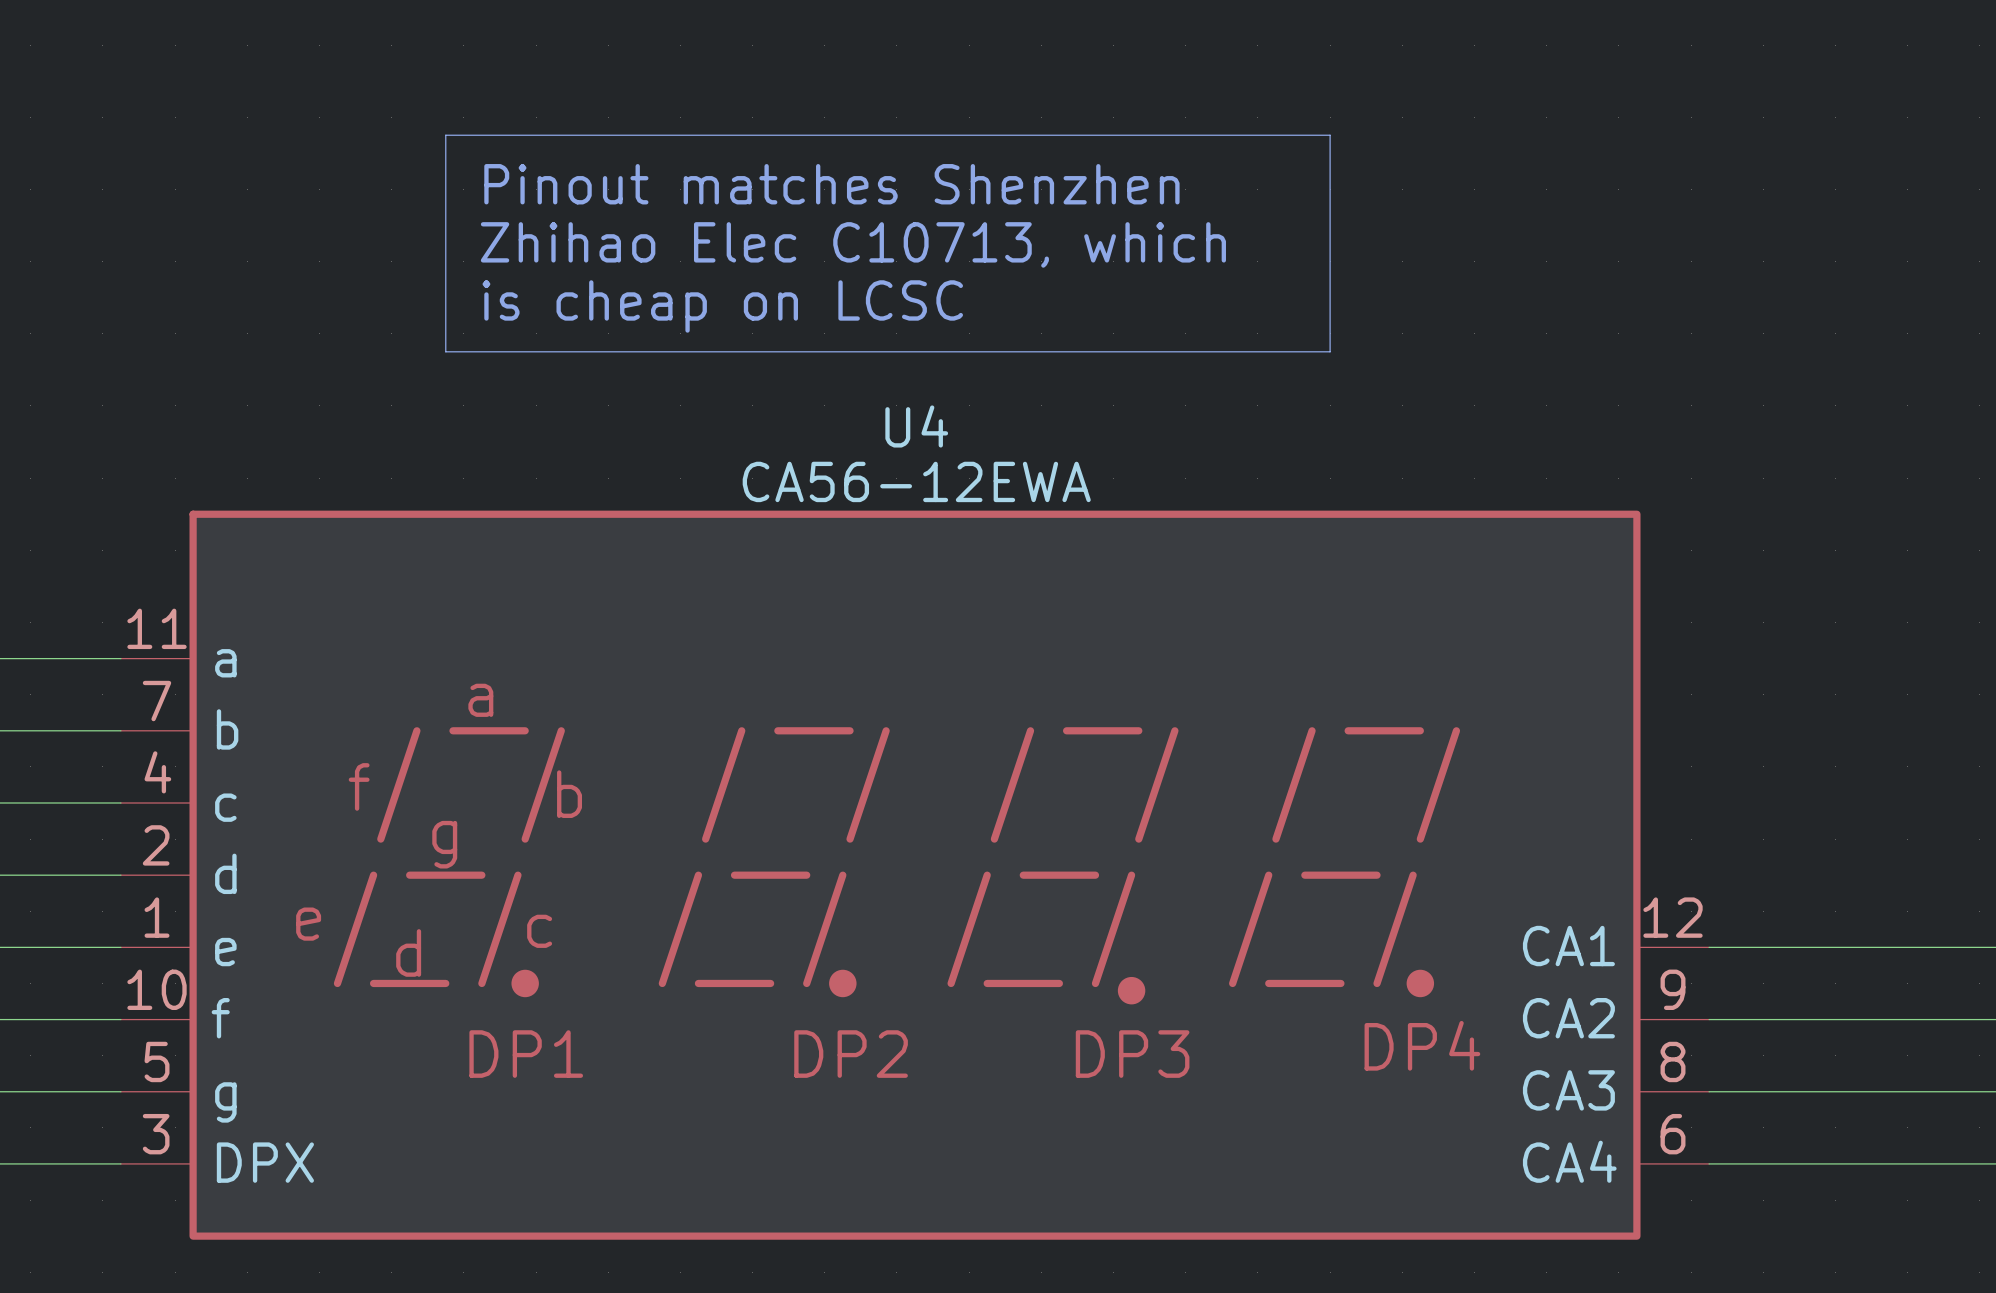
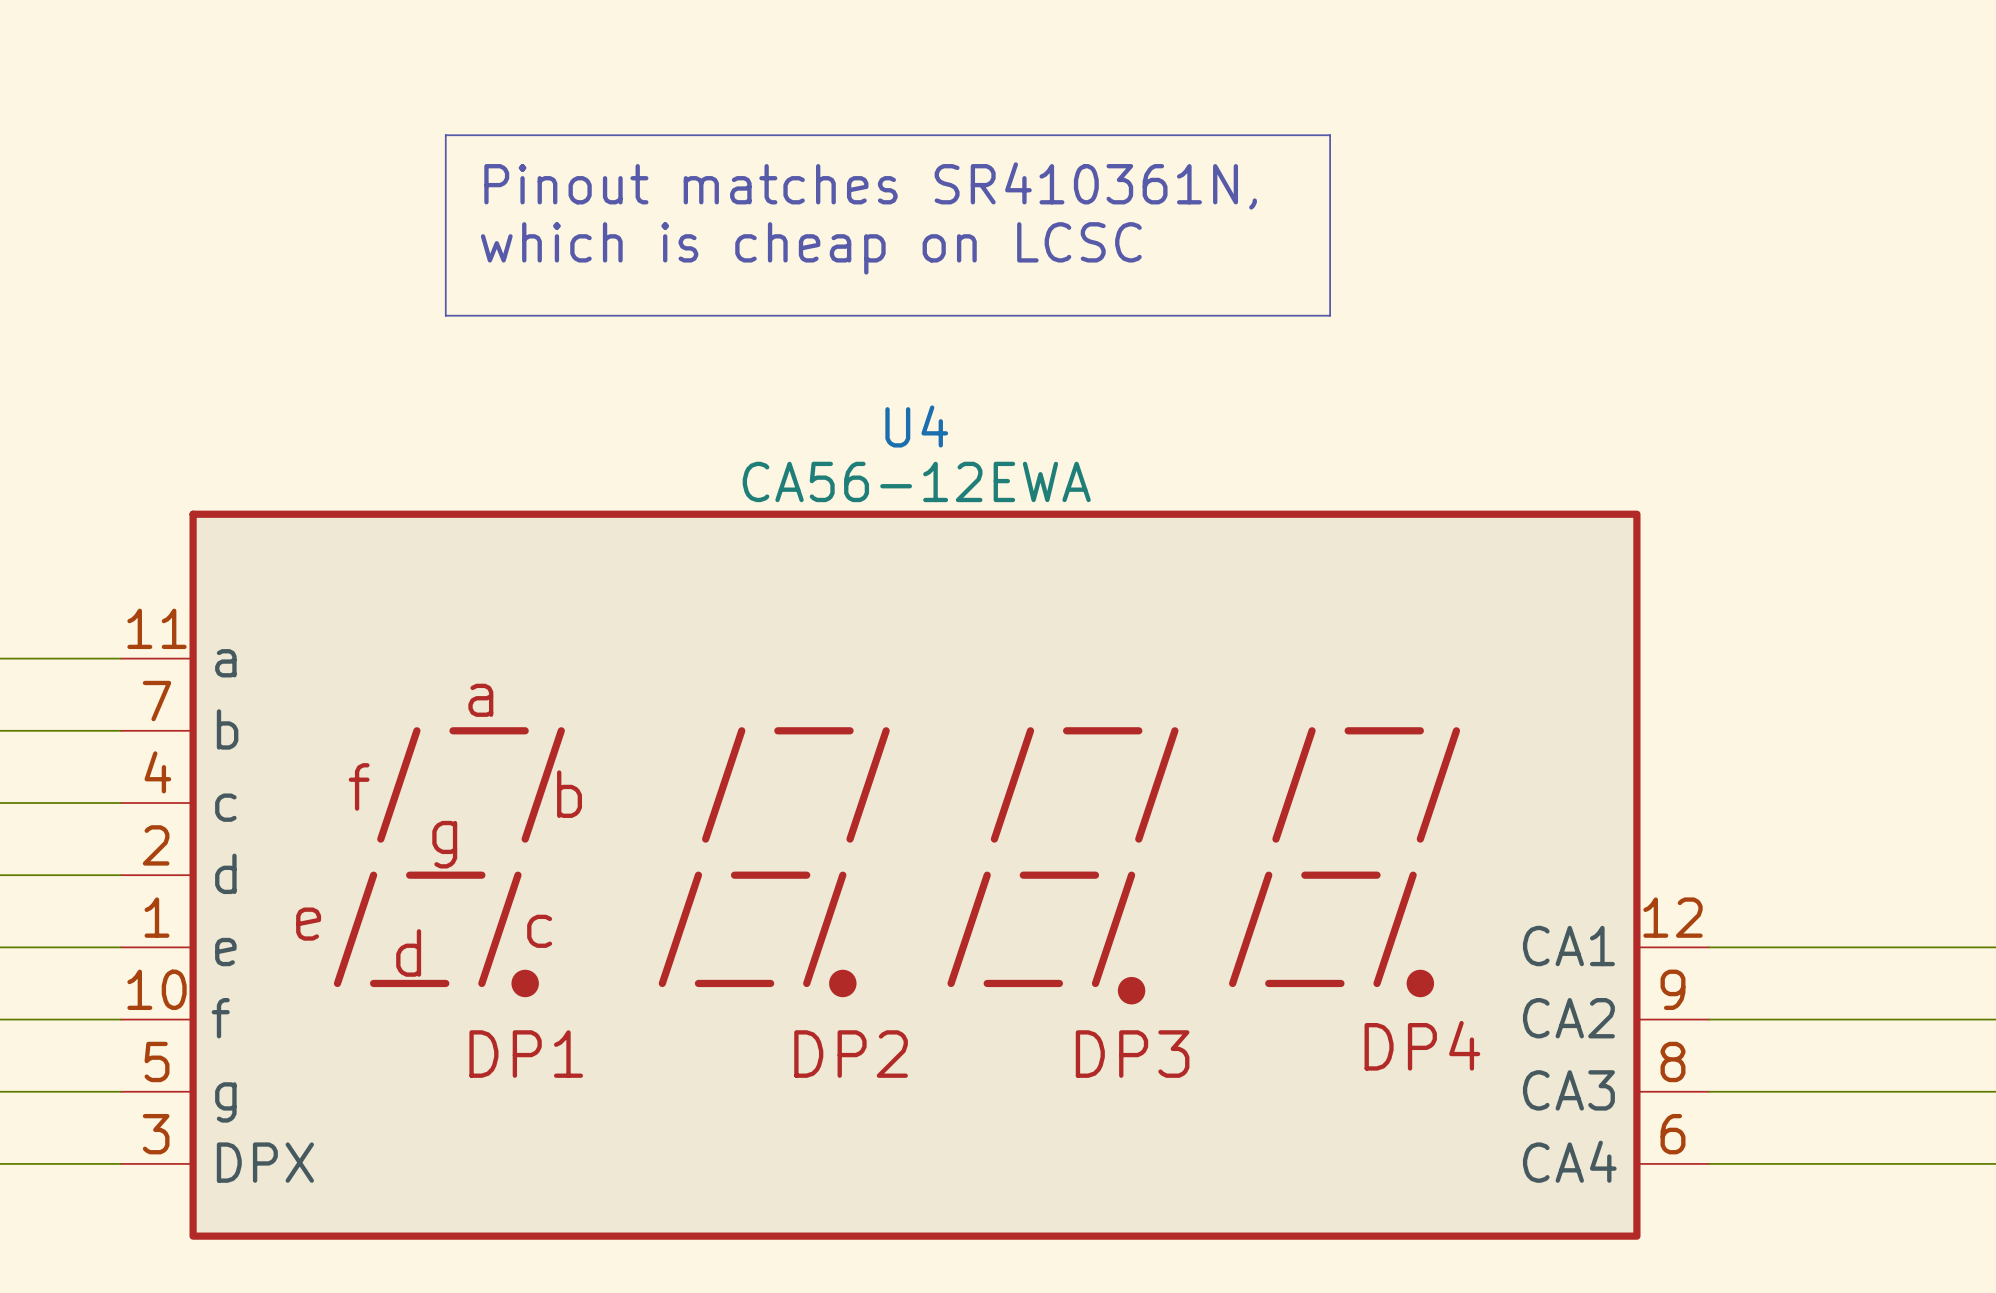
text: Pinout matches Shenzhen (831, 184) -> Pinout matches SR410361N, (870, 185)
text: Zhihao Elec C10713, which (853, 244) -> which is cheap on LCSC (811, 248)
text: is cheap on LCSC (722, 306) -> none
line: (445, 315) (445, 351) (1330, 351) (1330, 315) -> (445, 315) (1330, 315)

